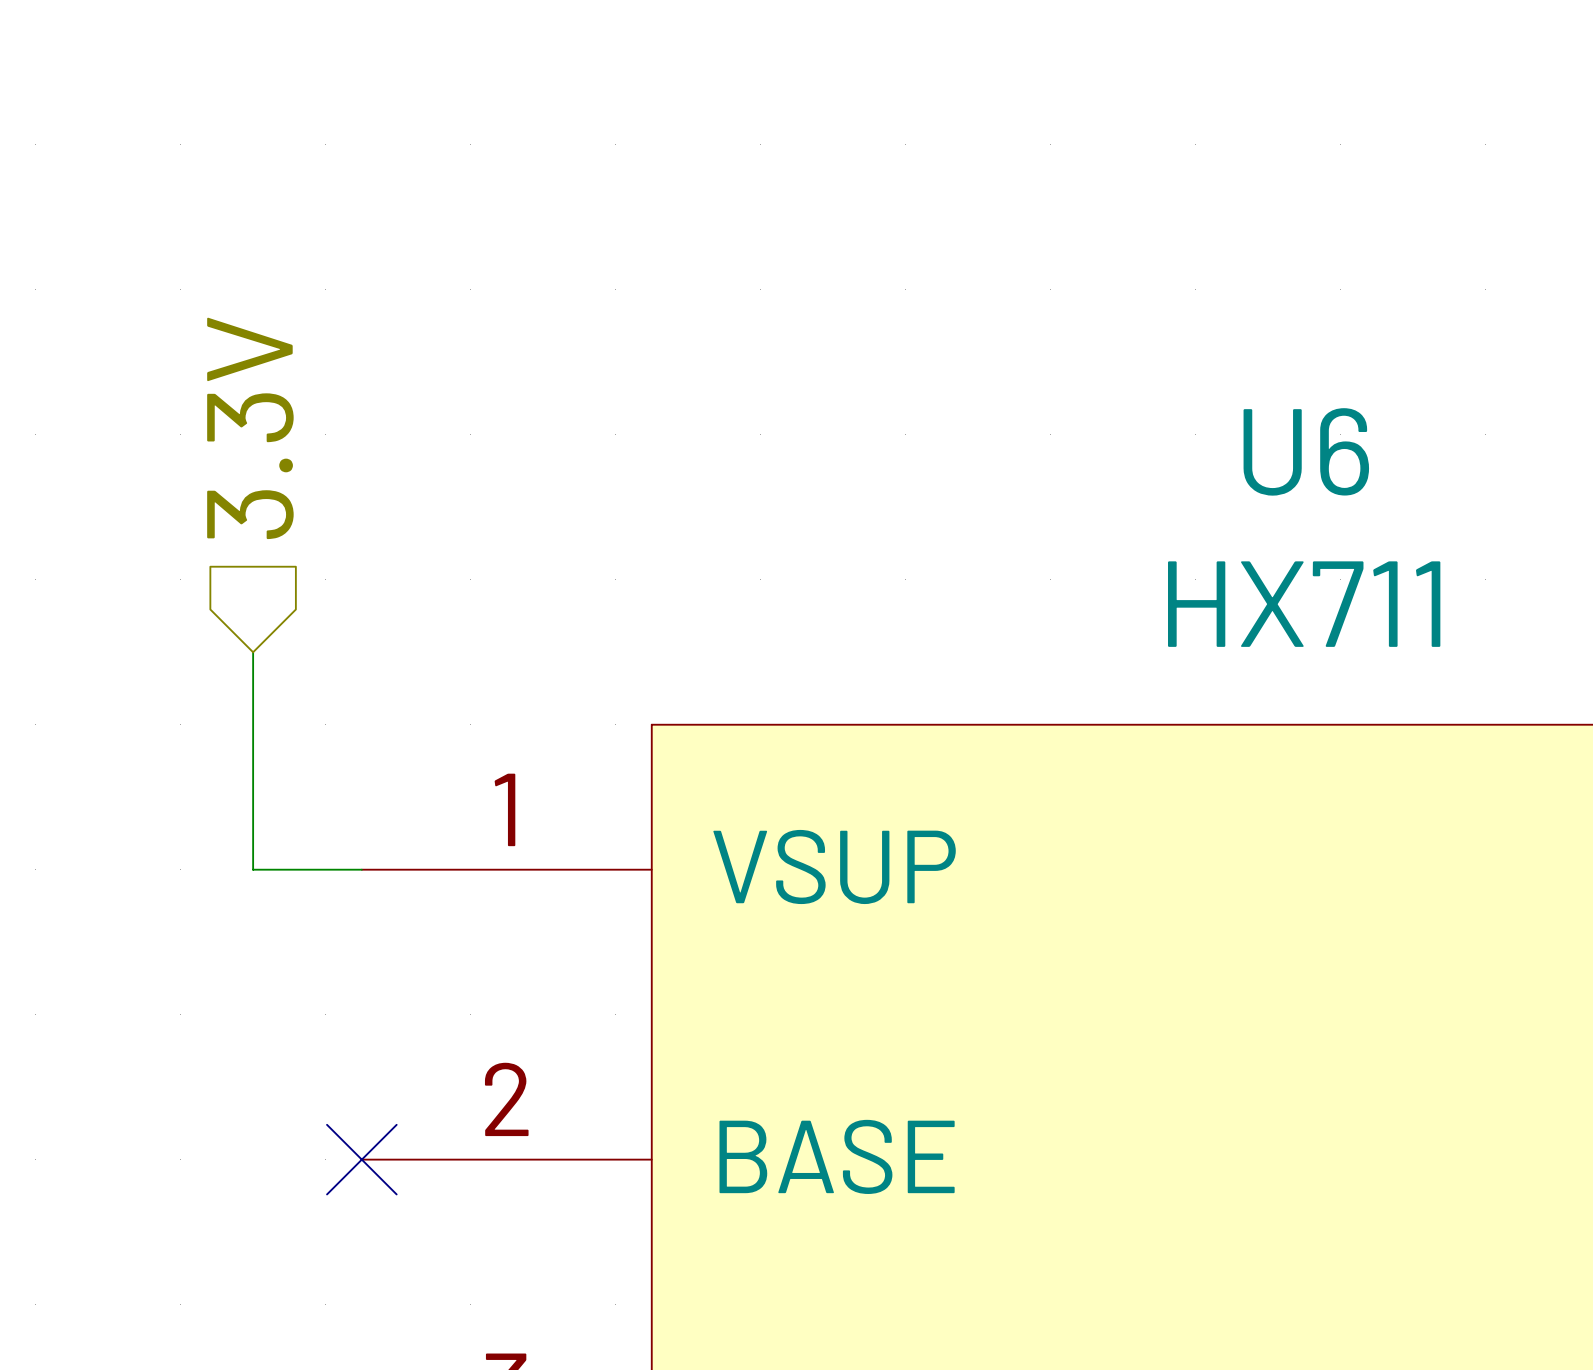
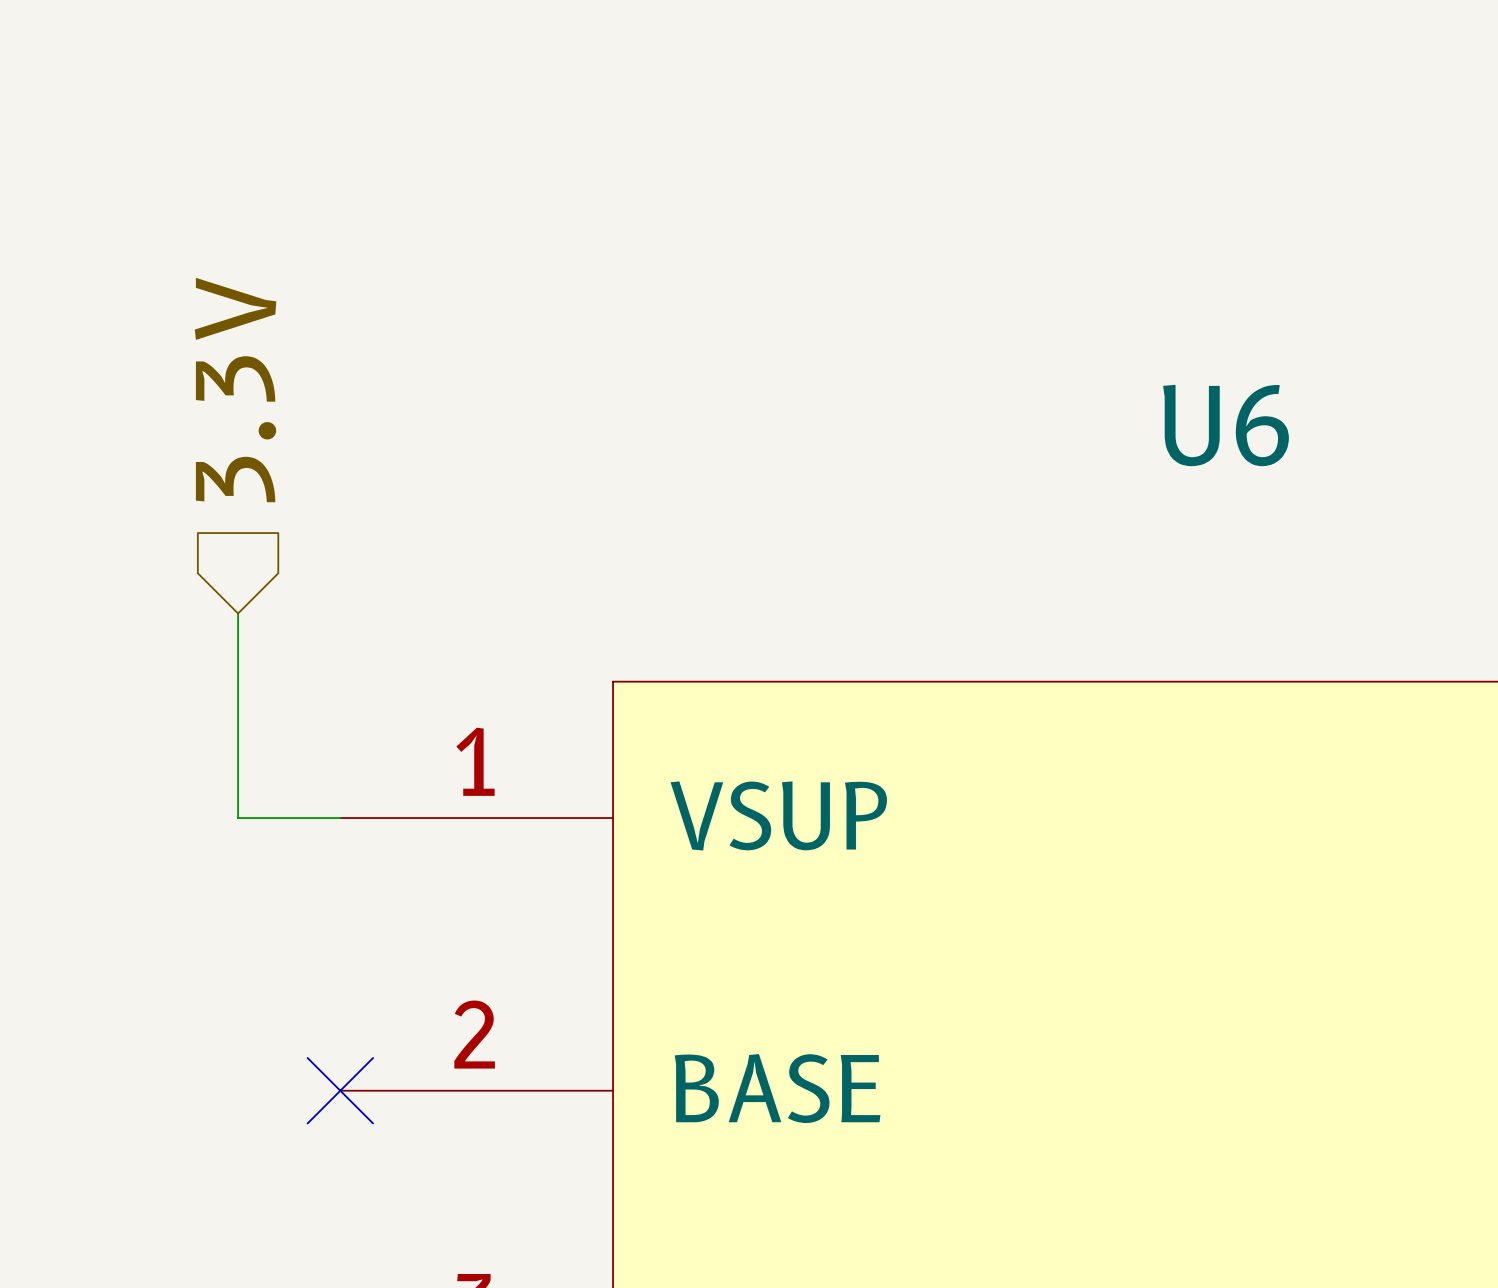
U6 value: HX711 (1304, 604) -> none

